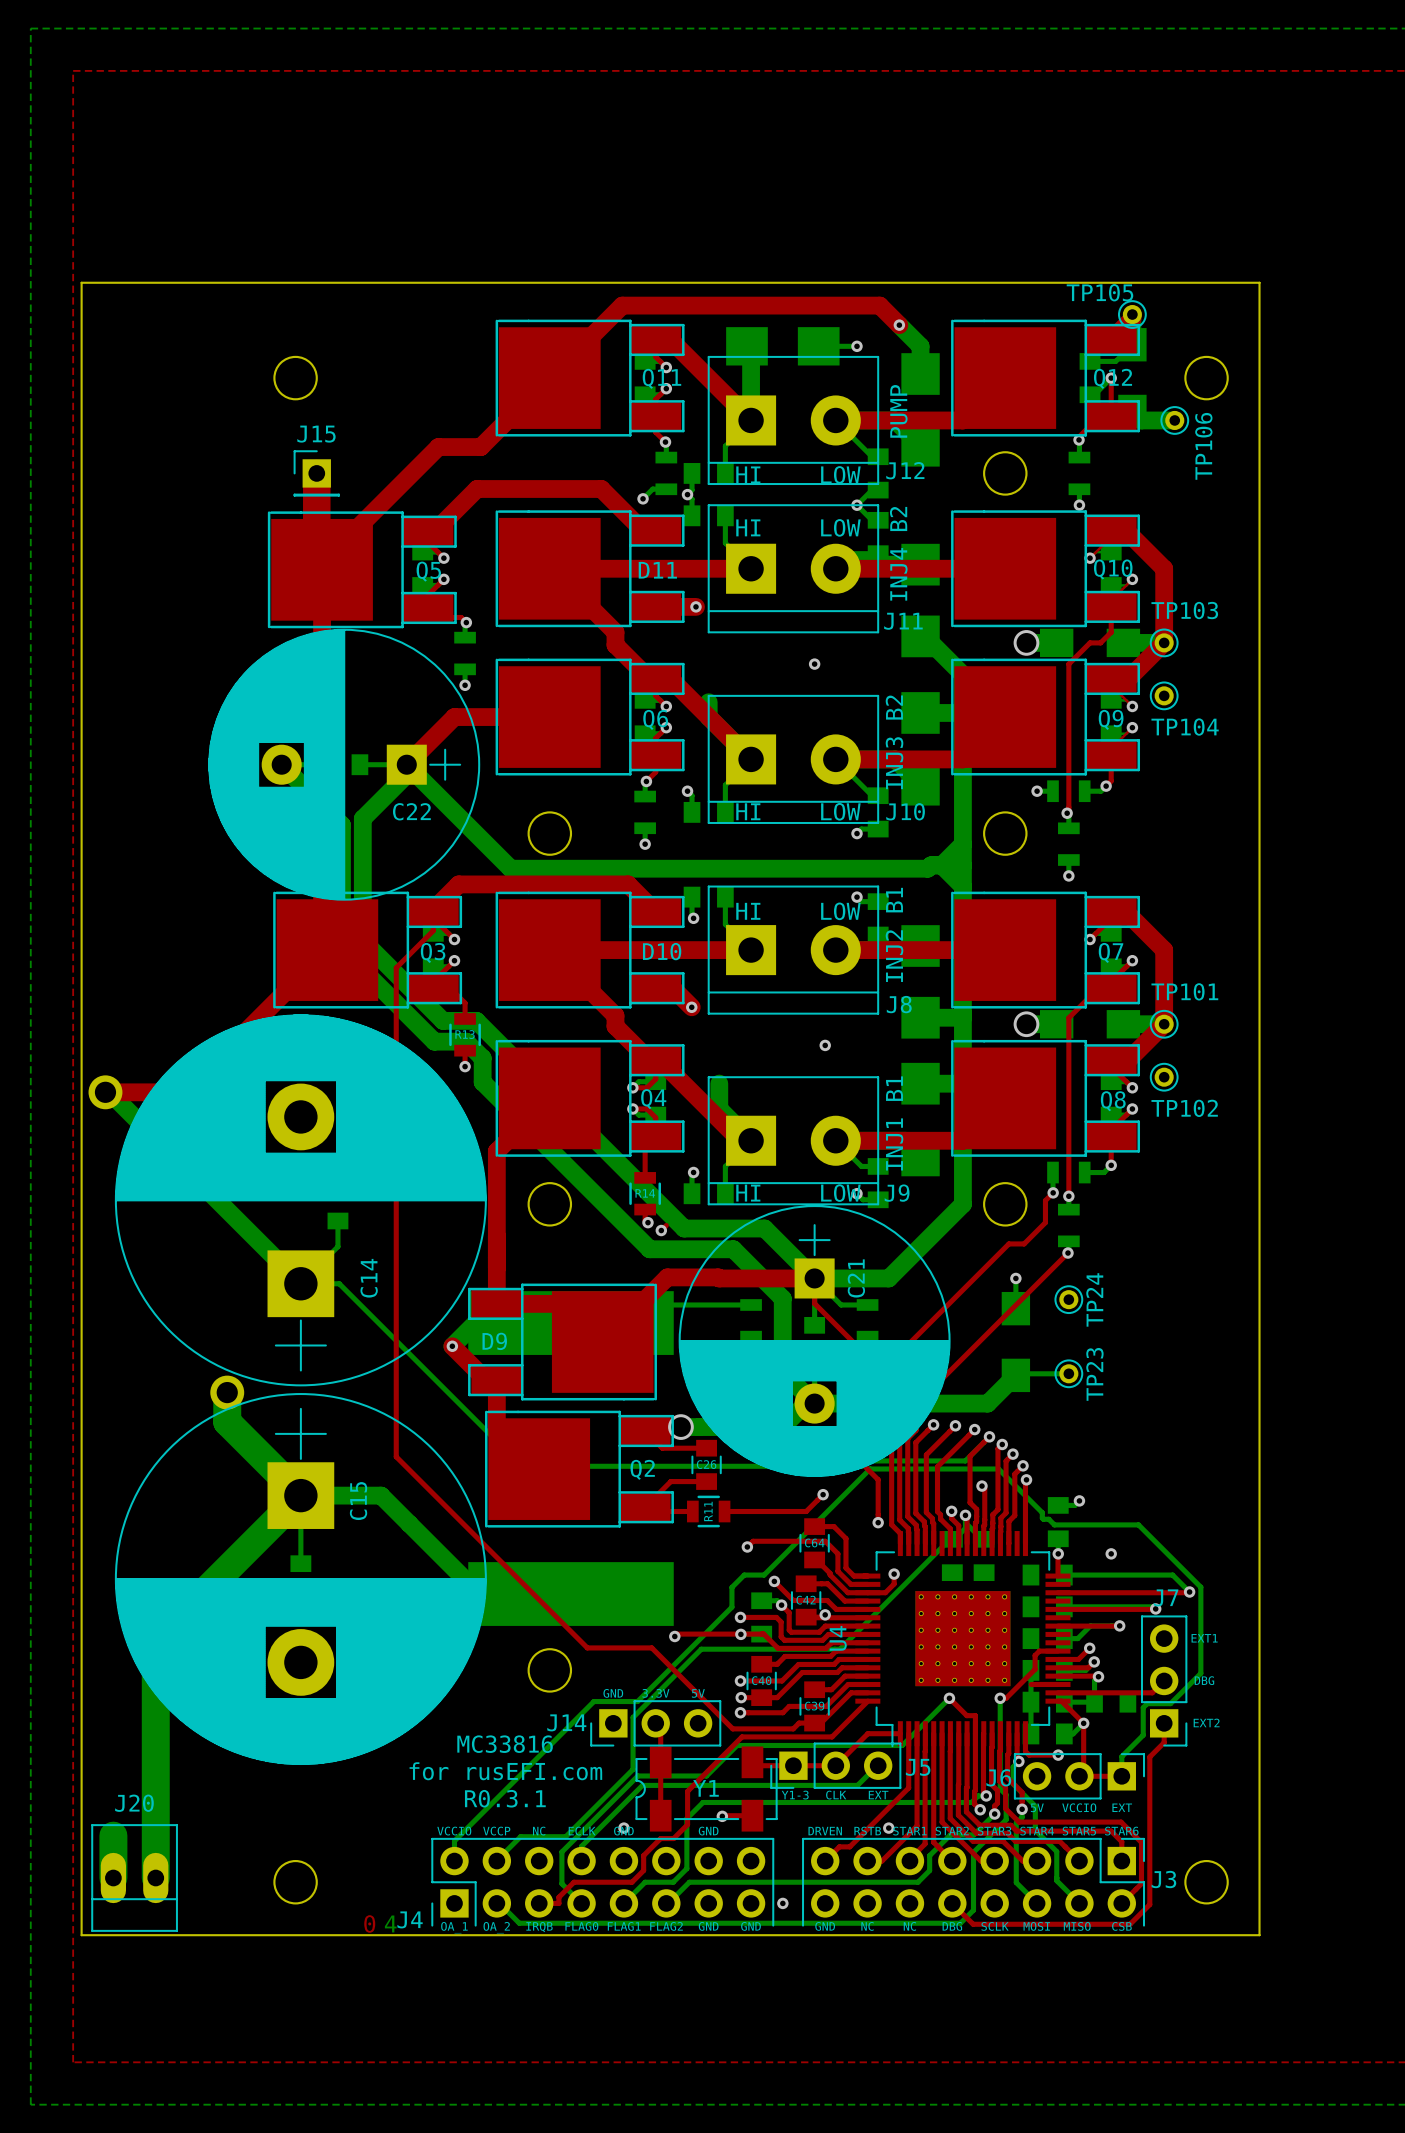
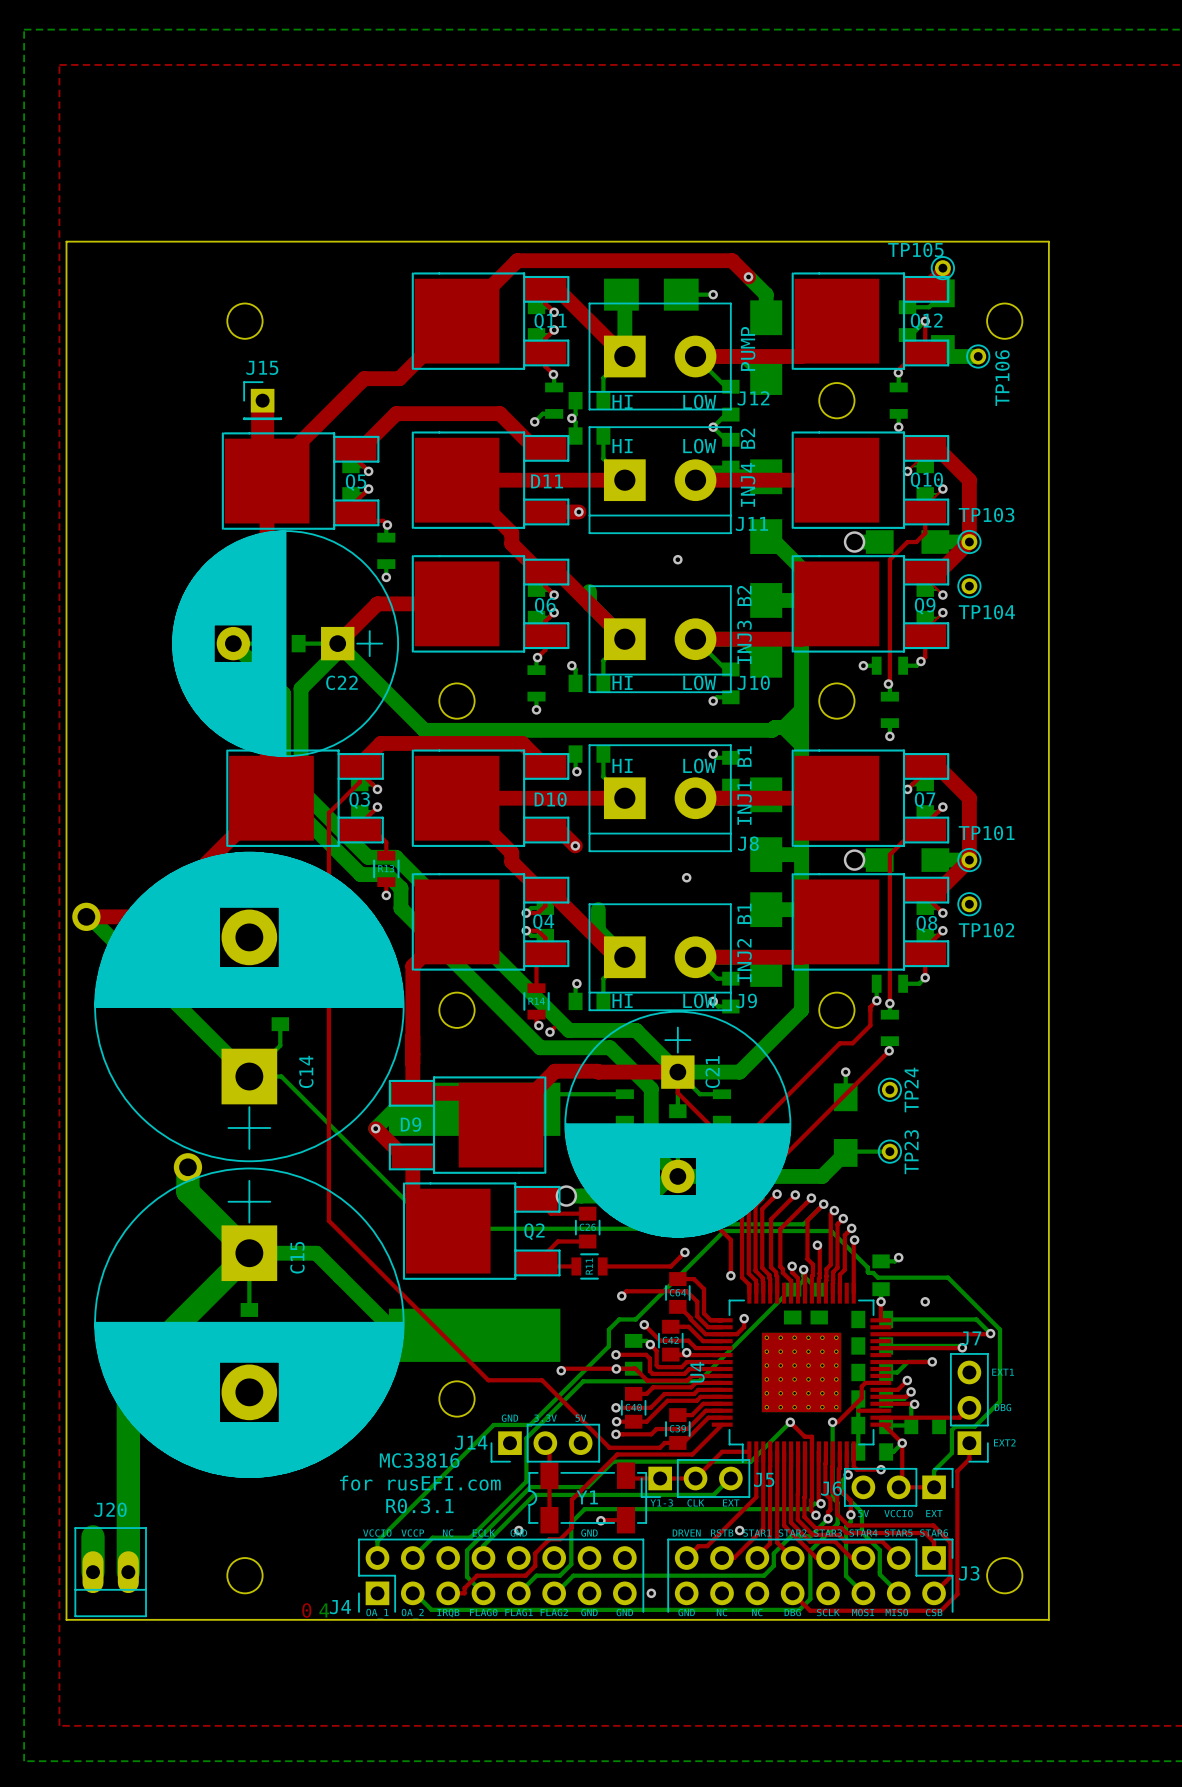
text: INJ2 B1 (894, 934) -> INJ1 B1 (744, 785)
text: INJ1 B1 (894, 1123) -> INJ2 B1 (744, 942)

